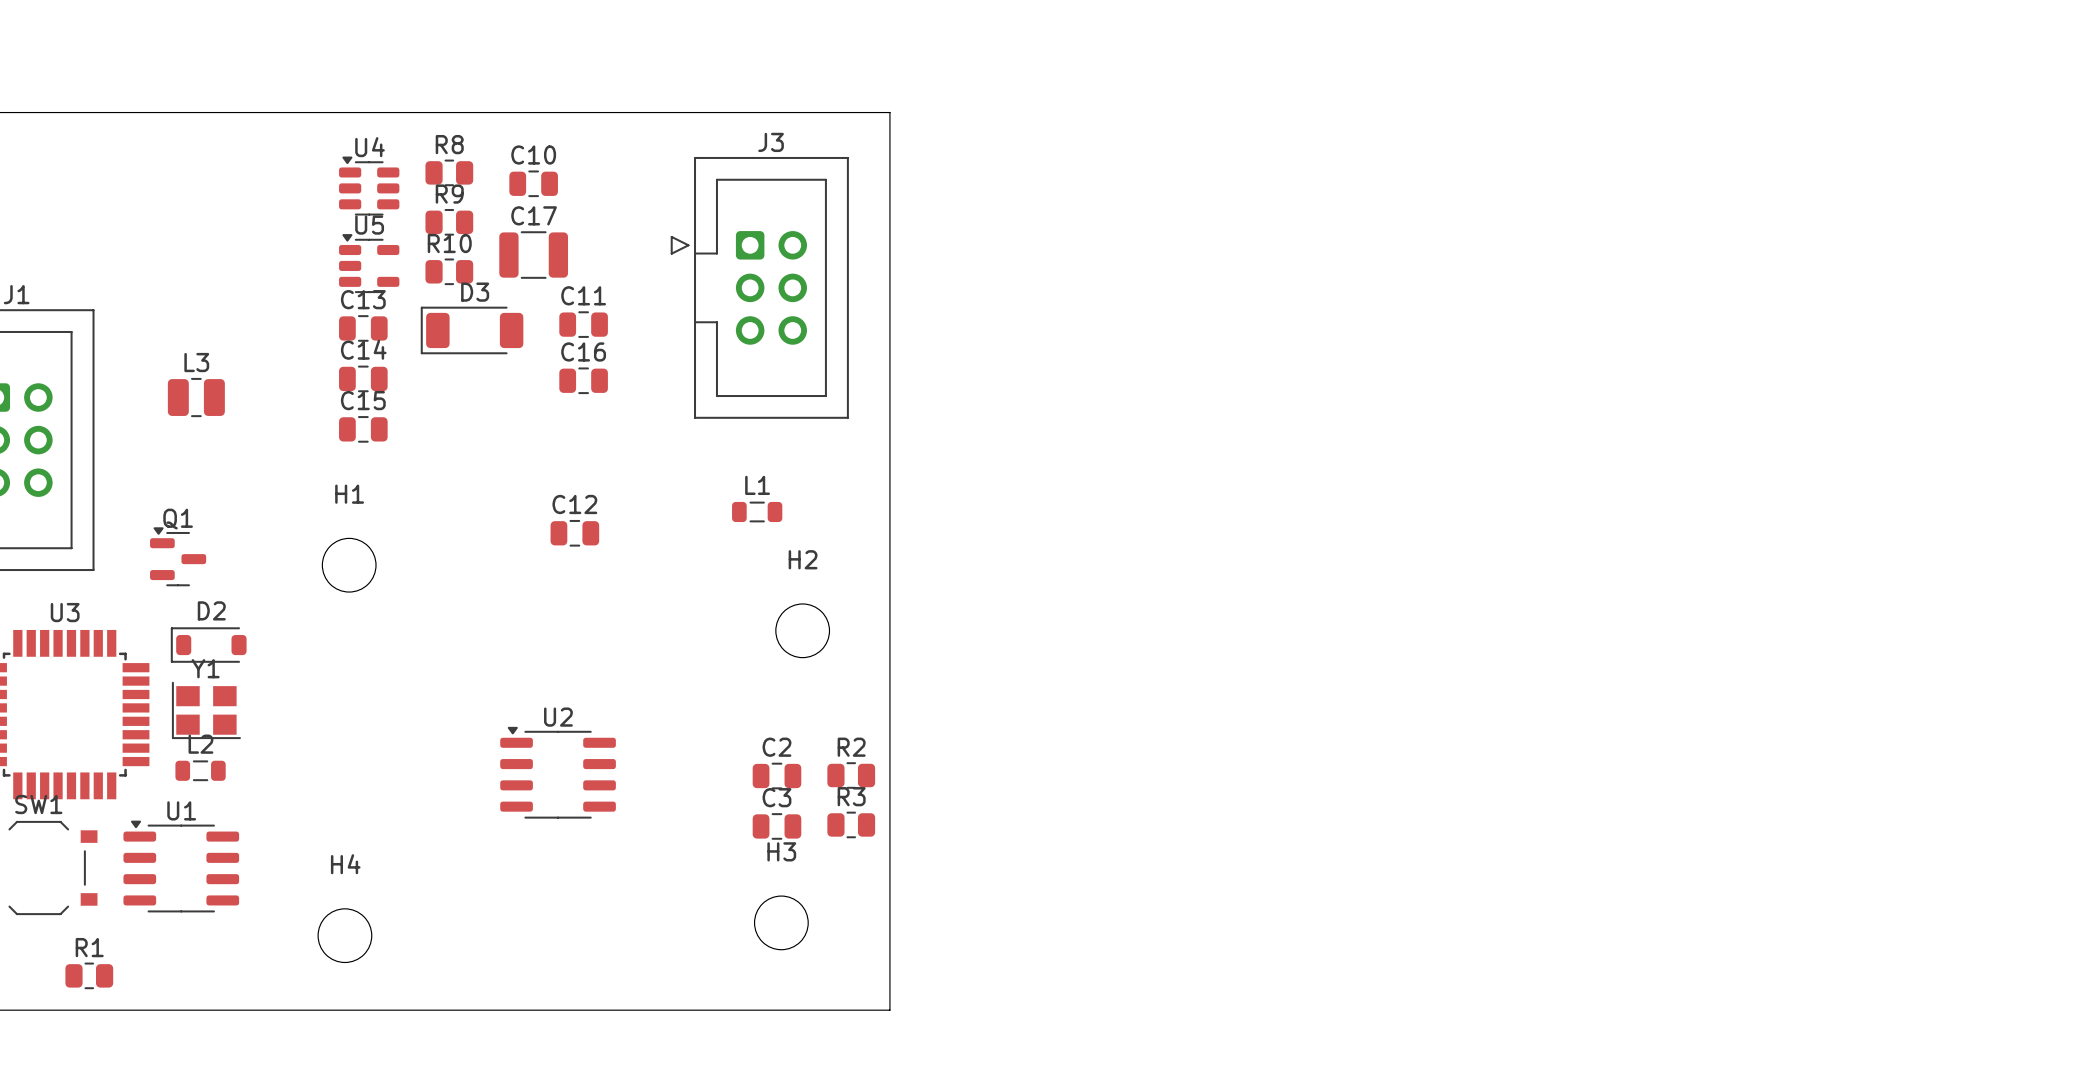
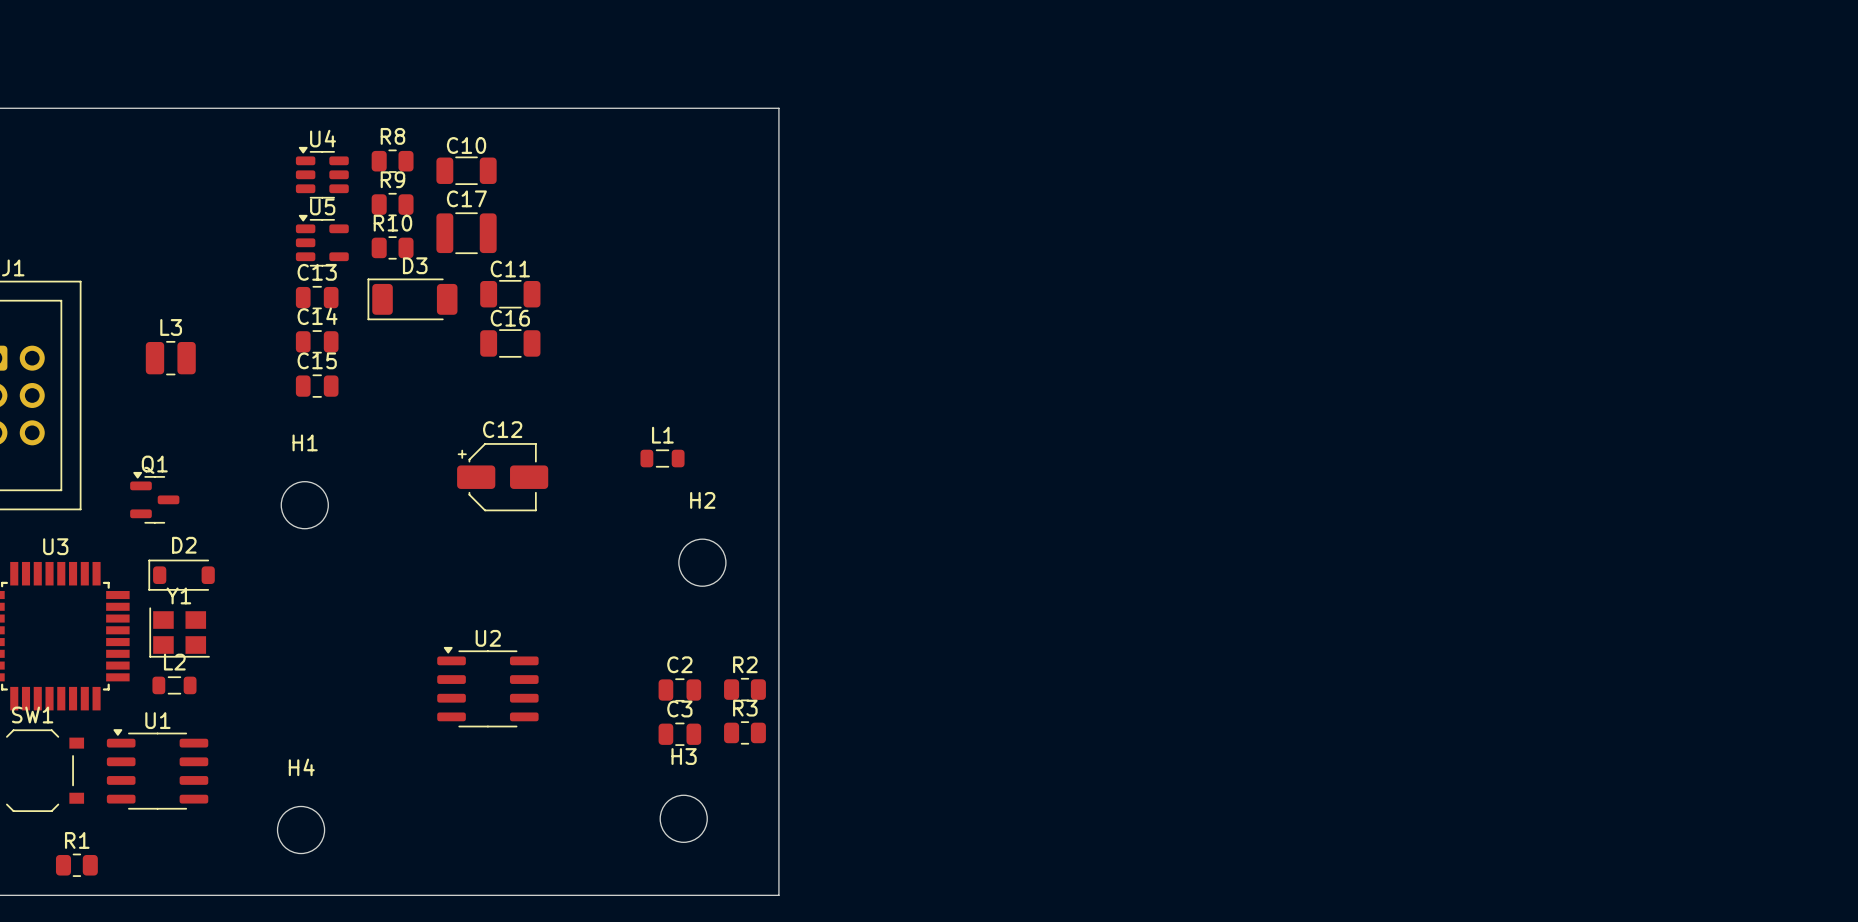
C10 footprint: [509, 170, 558, 198] -> [436, 156, 497, 186]
J3: (759, 287) -> none
C11 footprint: [559, 311, 608, 338] -> [480, 279, 541, 309]
C16 footprint: [559, 367, 608, 395] -> [480, 329, 541, 358]
C12 footprint: [550, 519, 600, 547] -> [457, 443, 549, 512]

